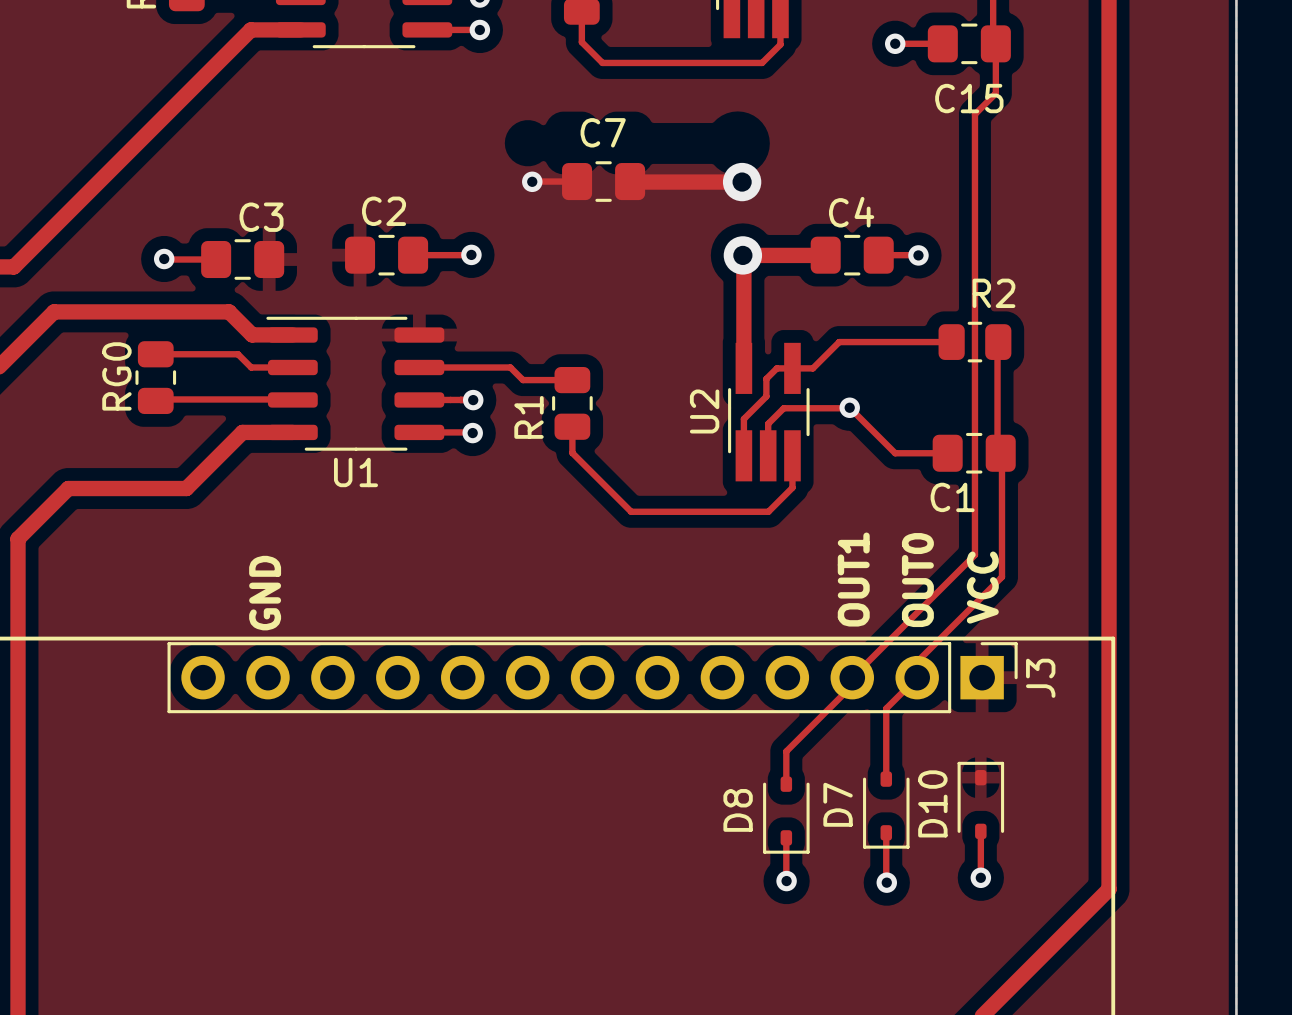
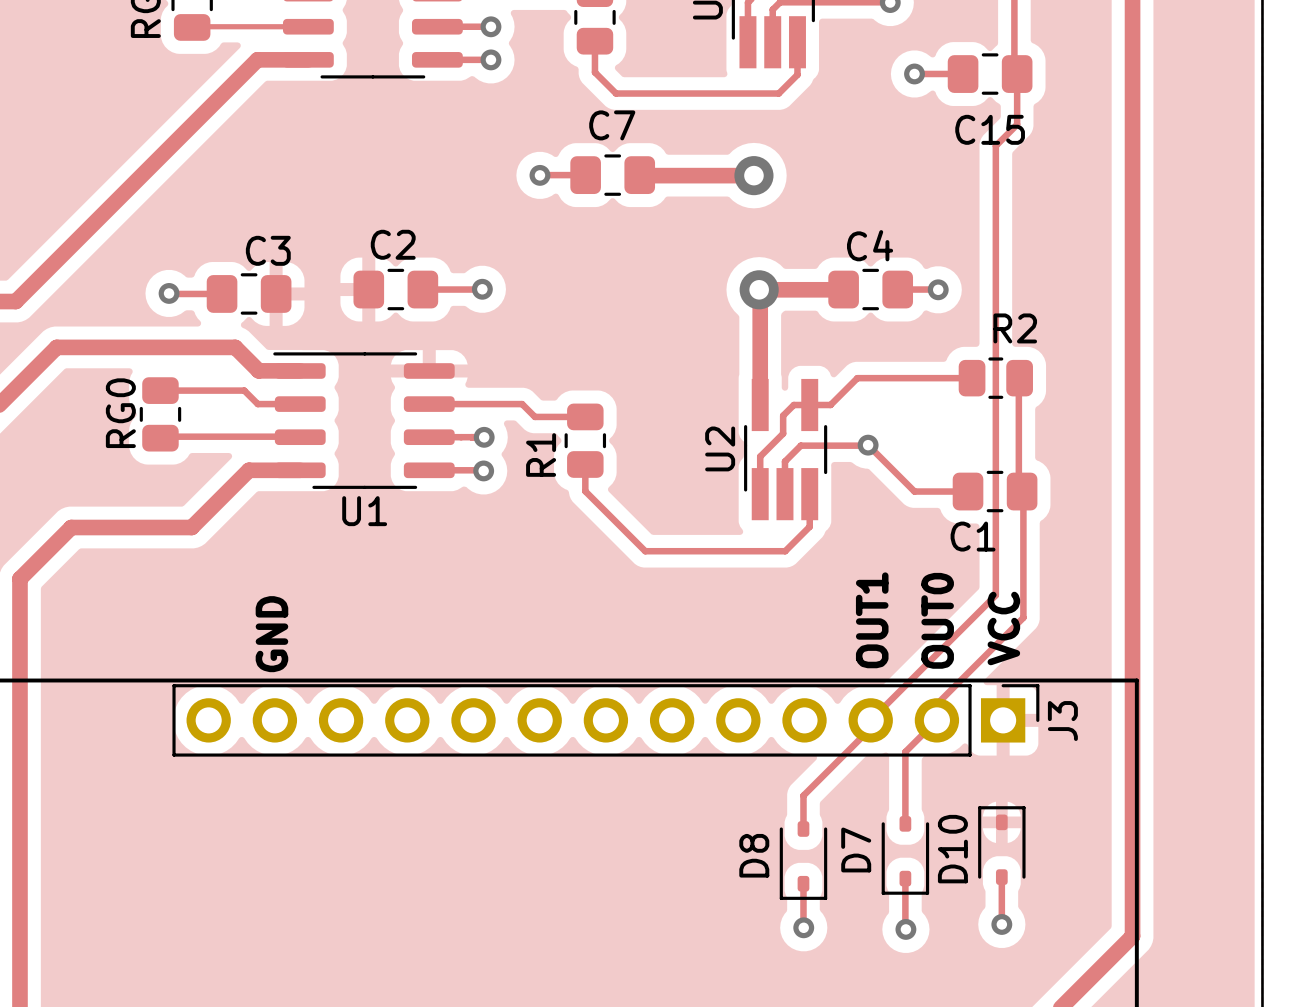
track: (532, 181) (577, 181) -> (540, 175) (585, 175)
via position: (532, 181) -> (539, 175)
C7 position: (603, 181) -> (612, 175)
track: (630, 181) (742, 182) -> (639, 175) (753, 175)
via position: (742, 182) -> (753, 175)

